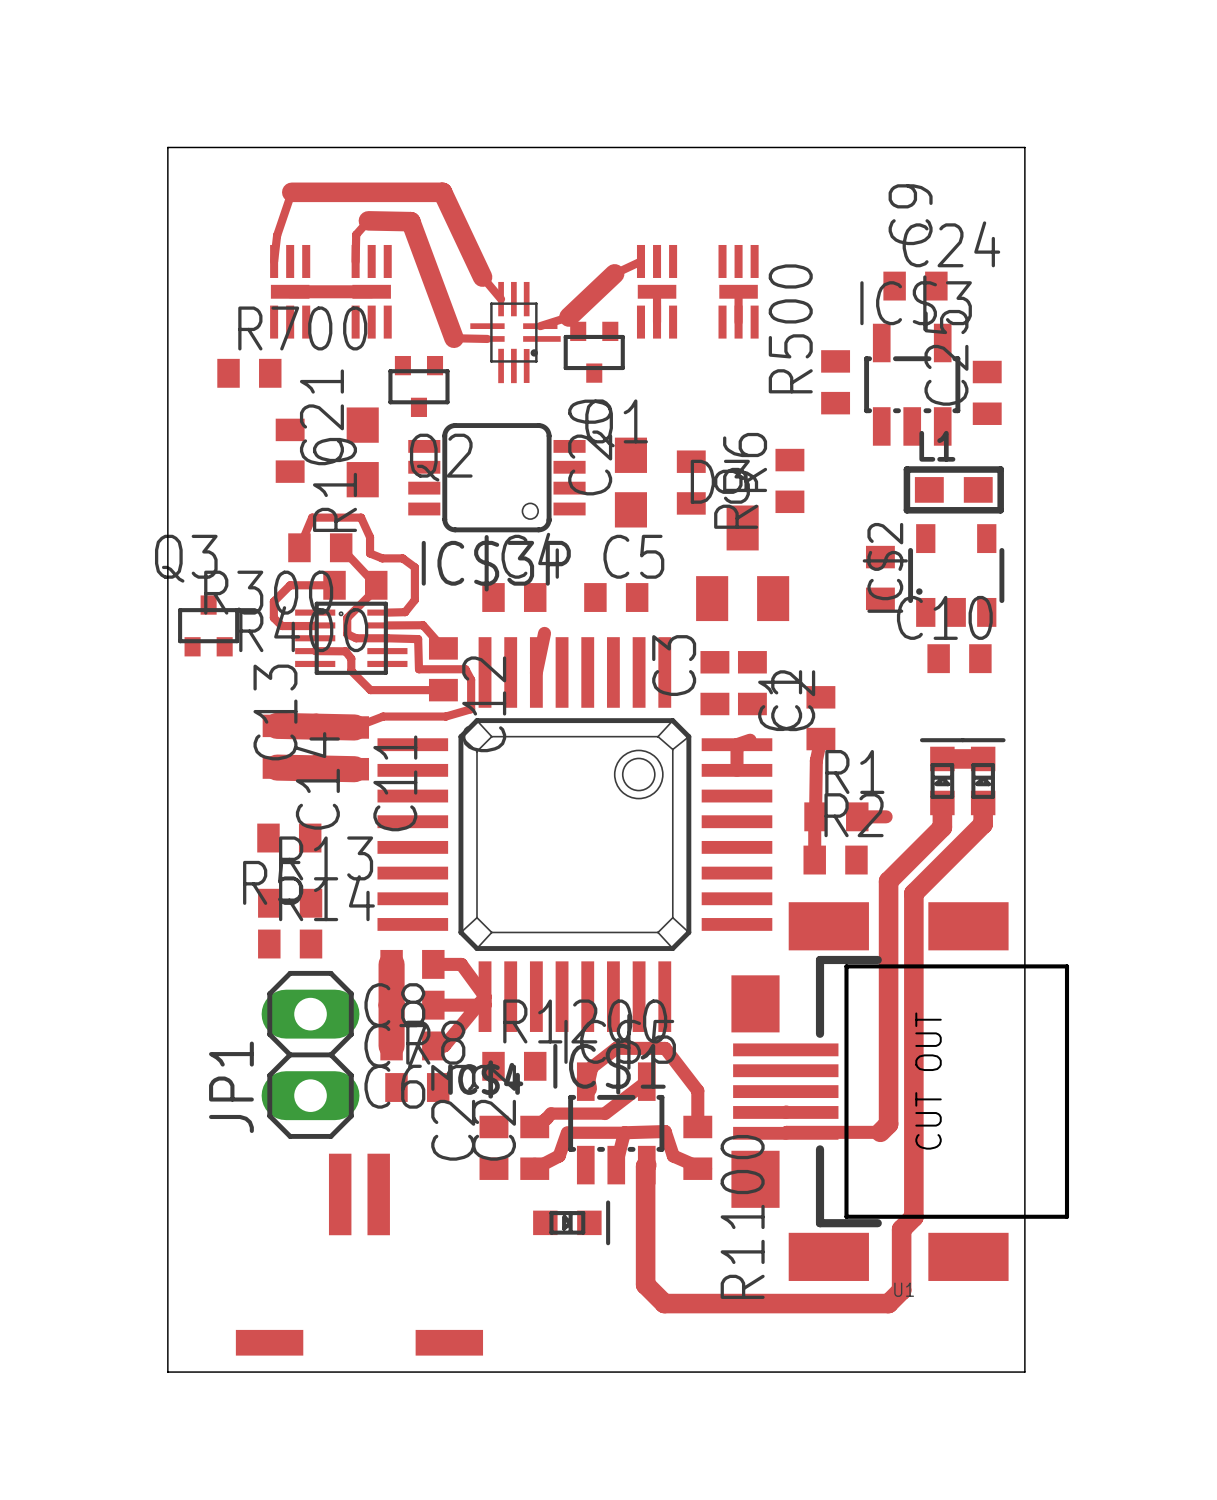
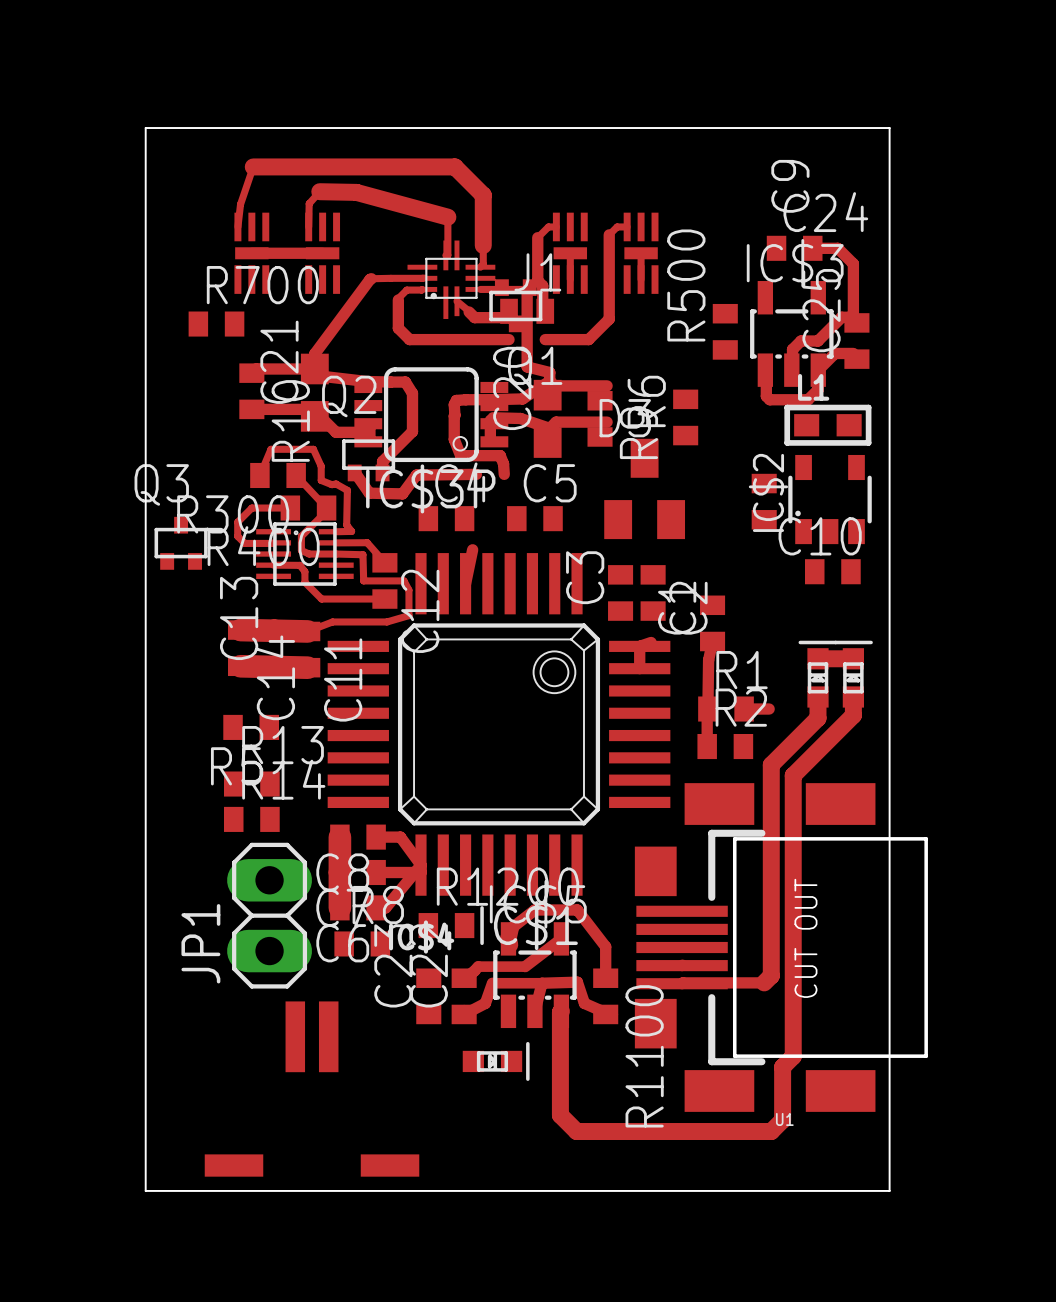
track: (442, 192) (482, 277) (501, 299) -> (384, 166) (454, 166) (483, 195) (483, 264) (480, 267)
track: (410, 221) (454, 338) (487, 338) -> (356, 192) (447, 217) (447, 255) (445, 255)
track: (640, 261) (614, 273) (568, 317) (540, 326) -> (556, 226) (548, 226) (537, 237) (537, 280) (542, 285) (542, 314) (545, 311)
track: none -> (627, 226) (617, 226) (609, 234) (609, 319) (588, 339) (545, 339)
track: none -> (812, 248) (837, 248) (853, 263) (853, 317) (841, 317) (818, 341) (801, 341) (792, 349) (791, 370)
track: none -> (424, 278) (370, 279) (314, 353) (314, 369)
part rotation: 0° (515, 332) -> 90° clockwise (451, 279)
track: none -> (422, 289) (406, 290) (398, 298) (398, 328) (409, 339) (509, 339)
track: none -> (480, 289) (525, 289) (527, 366) (549, 372) (549, 381)
track: none -> (456, 301) (474, 317) (506, 317)
J1: none -> (527, 311)
Q2 rotation: 0° (418, 386) -> 180° (368, 454)
Q2 position: (418, 386) -> (368, 454)
track: none -> (853, 353) (834, 353) (818, 370) (818, 389) (808, 399) (769, 399) (766, 396) (765, 370)
track: none -> (314, 369) (324, 376) (366, 381) (405, 382) (412, 393) (412, 431) (382, 461) (382, 472)
track: none -> (314, 369) (256, 369) (251, 373)
track: none -> (549, 381) (554, 385) (607, 385)
track: none -> (549, 381) (522, 398) (456, 400) (454, 404) (454, 439) (460, 455) (500, 455) (503, 463) (504, 474)
track: none -> (251, 409) (307, 409) (314, 416) (320, 416) (336, 432) (368, 432) (368, 436)
track: none -> (607, 422) (556, 422) (549, 428) (520, 418) (492, 417) (490, 420) (490, 438)
track: none -> (354, 472) (369, 493) (402, 493) (416, 475) (476, 474)
track: (382, 558) (402, 558) (414, 567) (414, 599) (405, 612) -> (331, 484) (336, 483) (347, 490) (346, 525) (351, 531)

